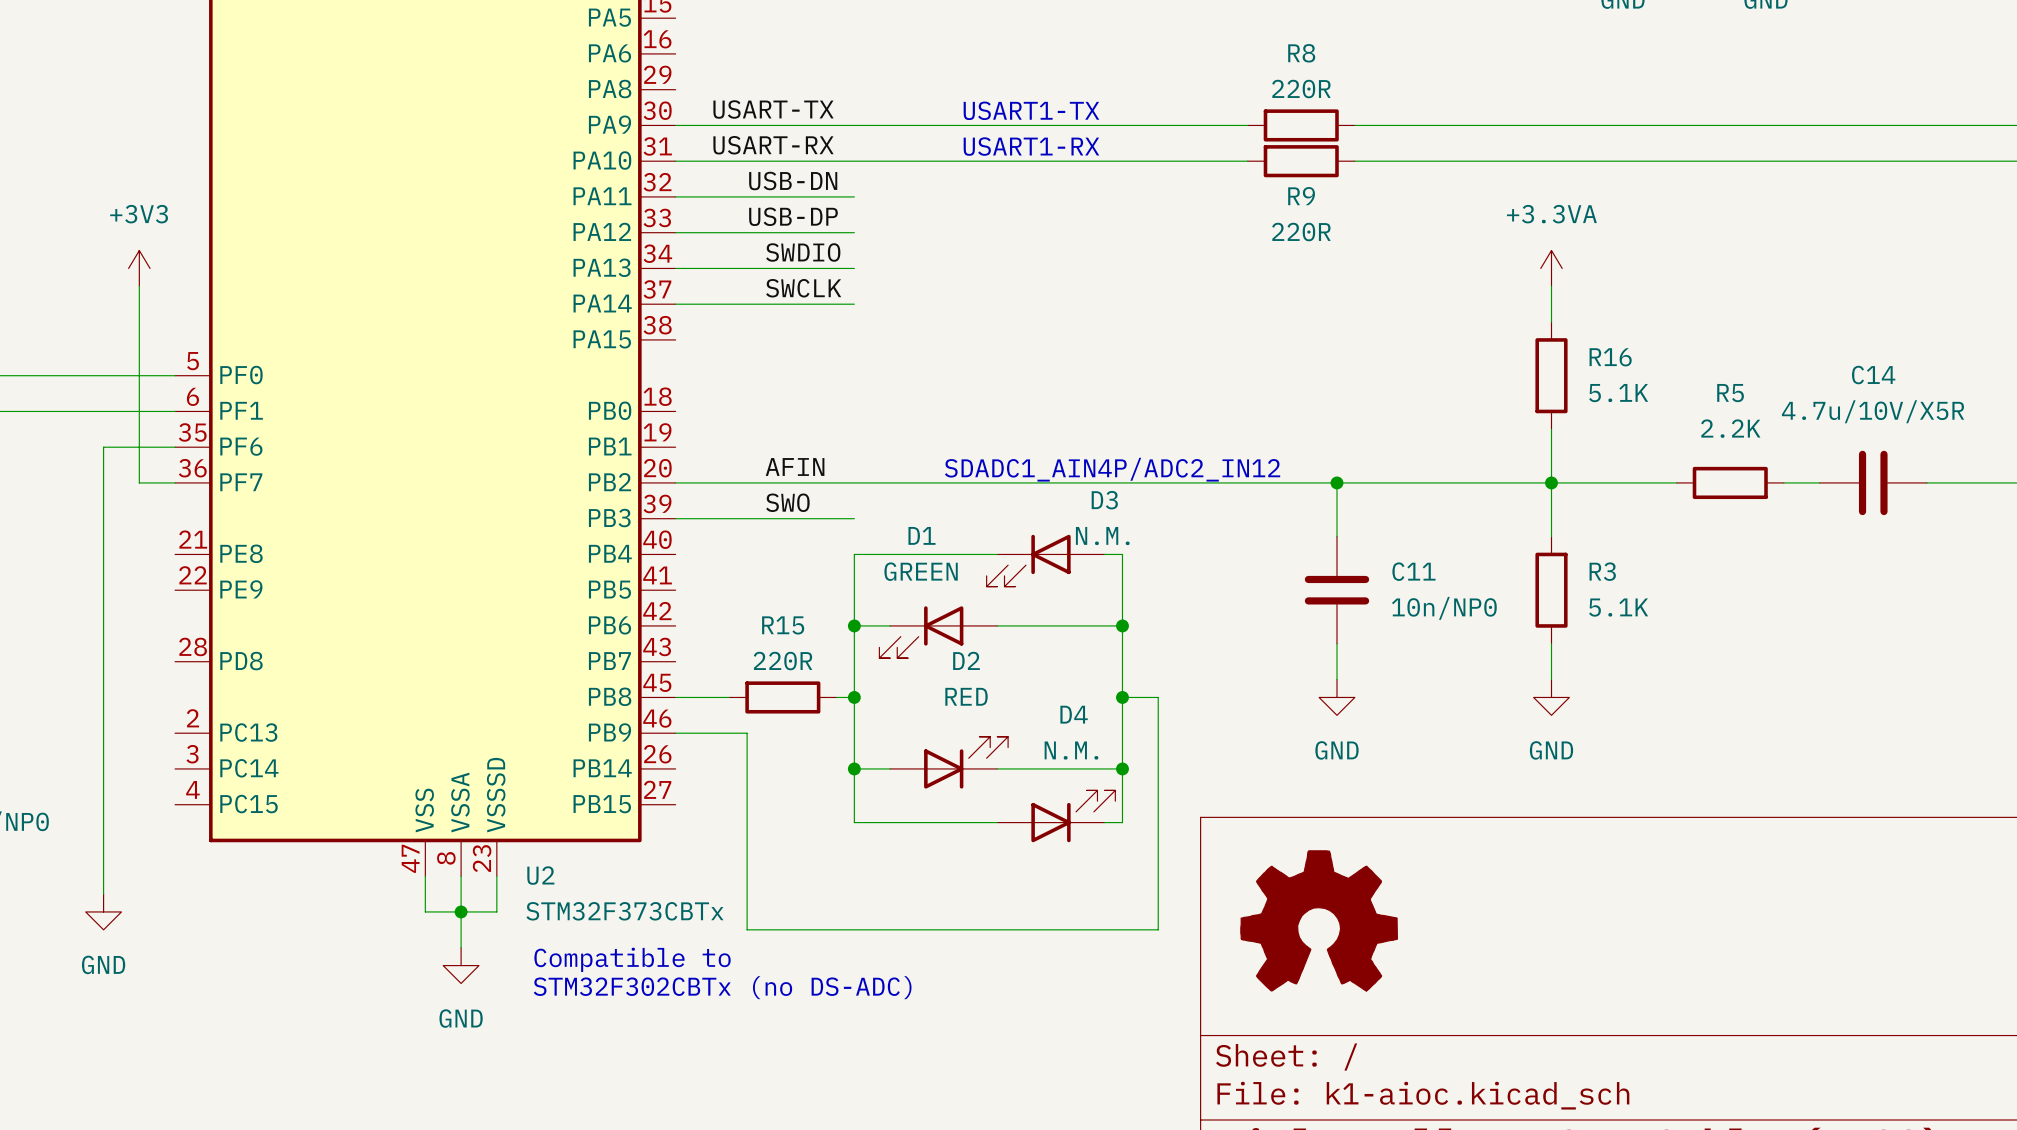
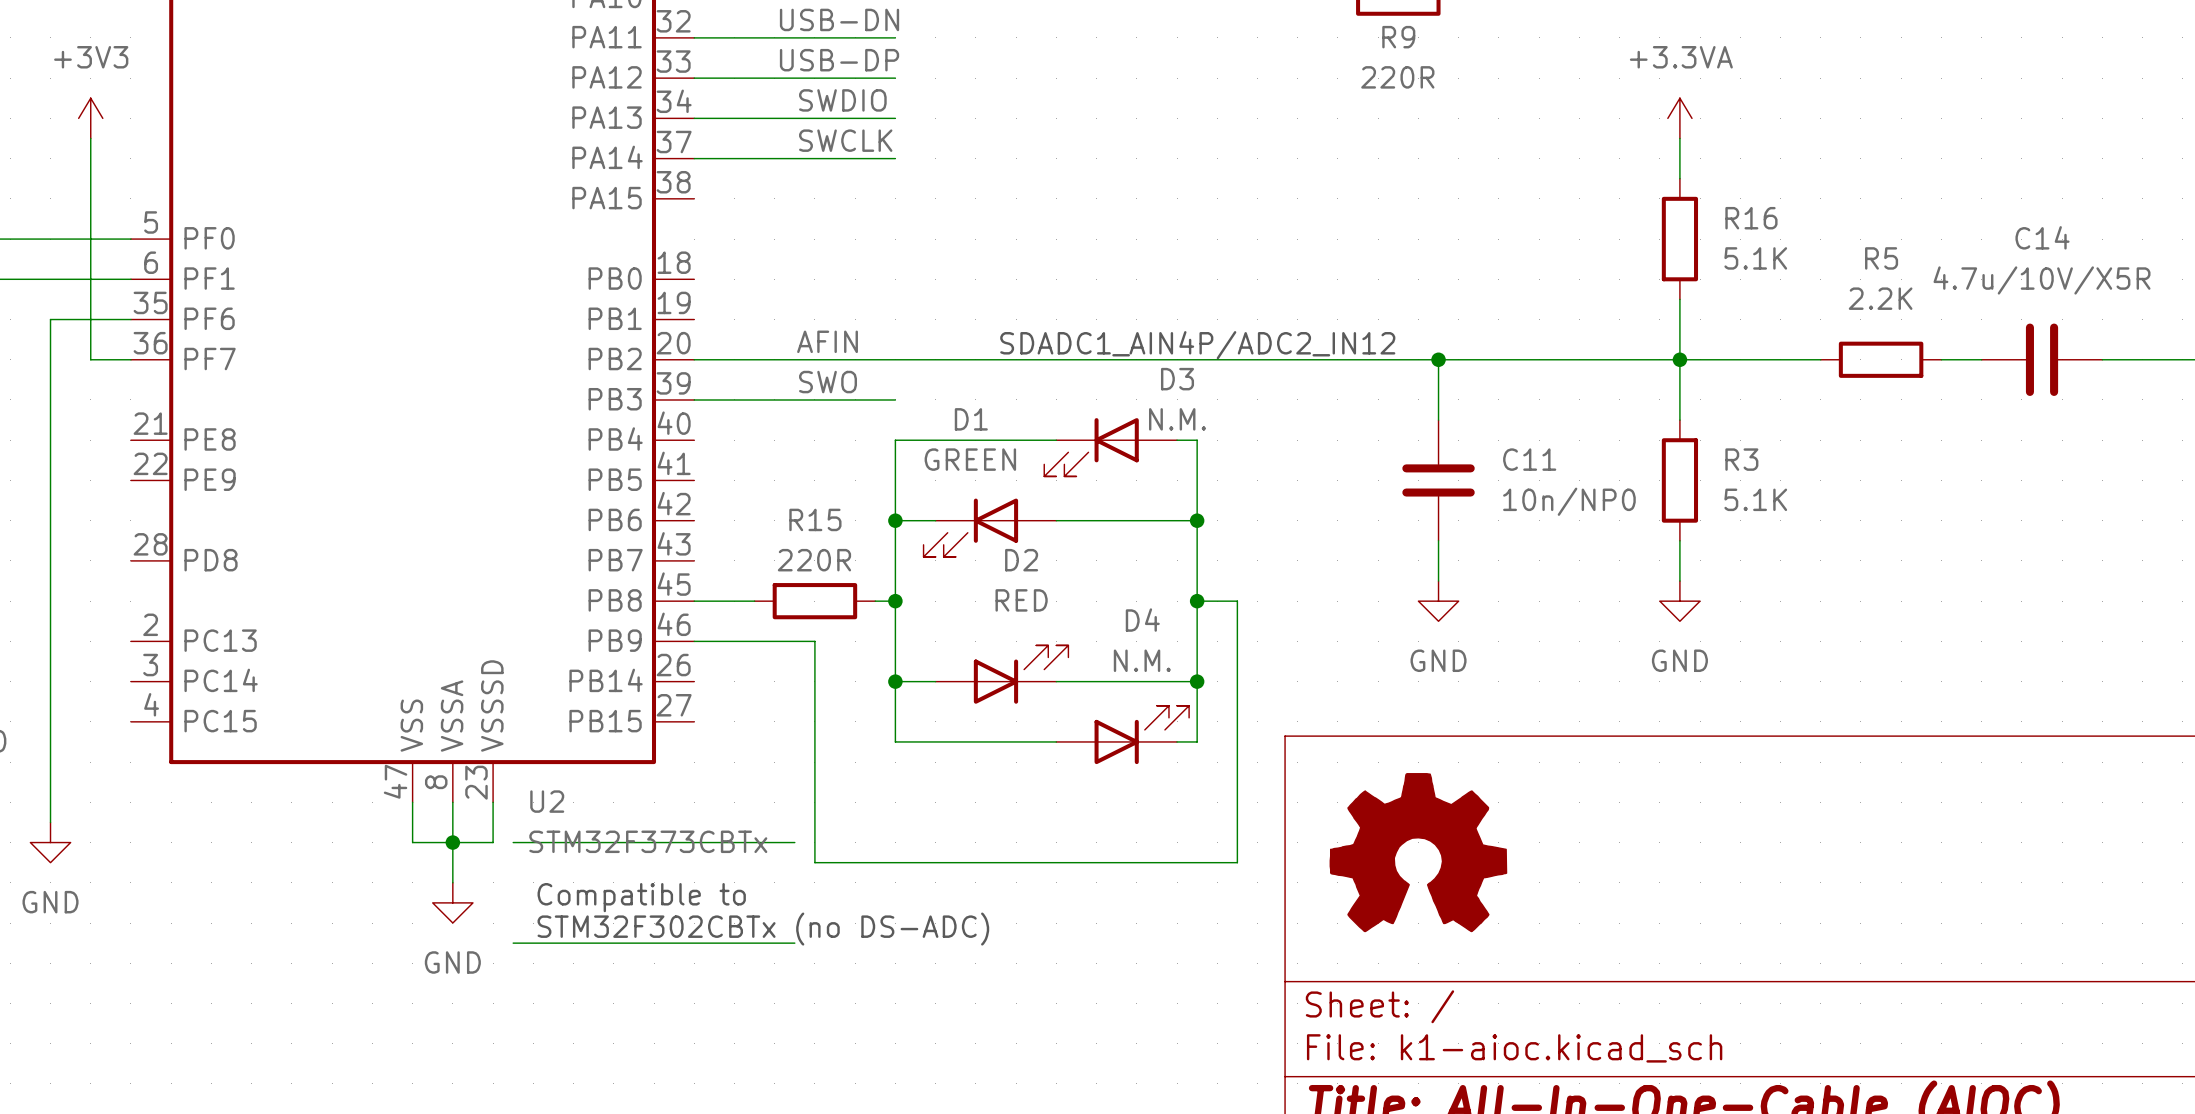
wire: (747, 733) (747, 929) (782, 929) -> (774, 641) (814, 641) (814, 862)
wire: none -> (513, 842) (794, 842)
wire: none -> (513, 943) (794, 943)

